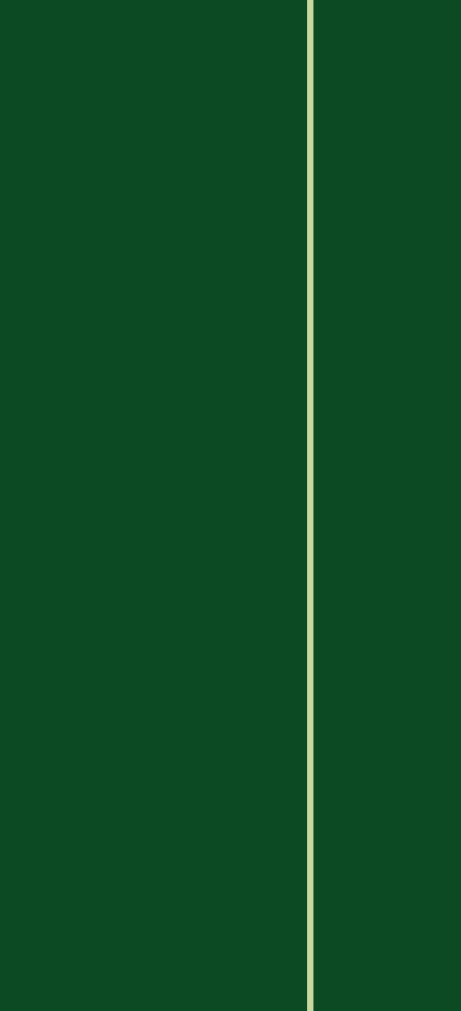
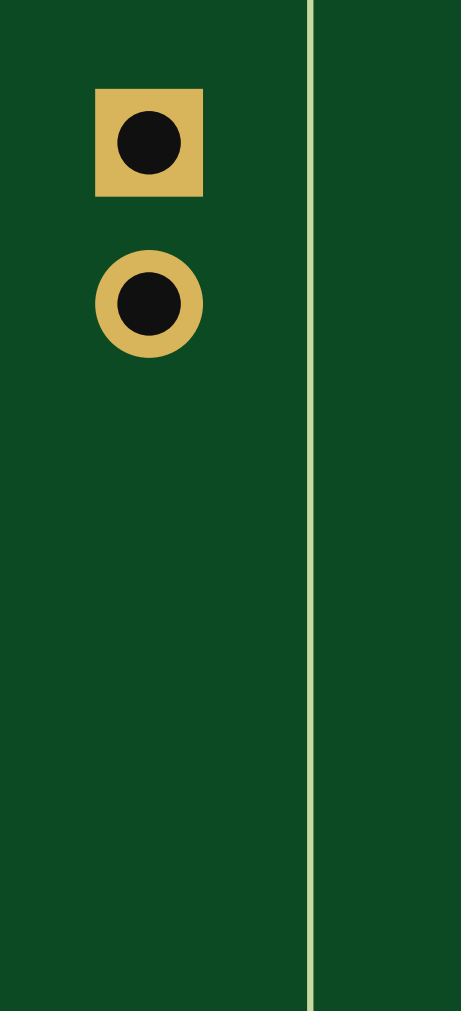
part: none -> (149, 223)

